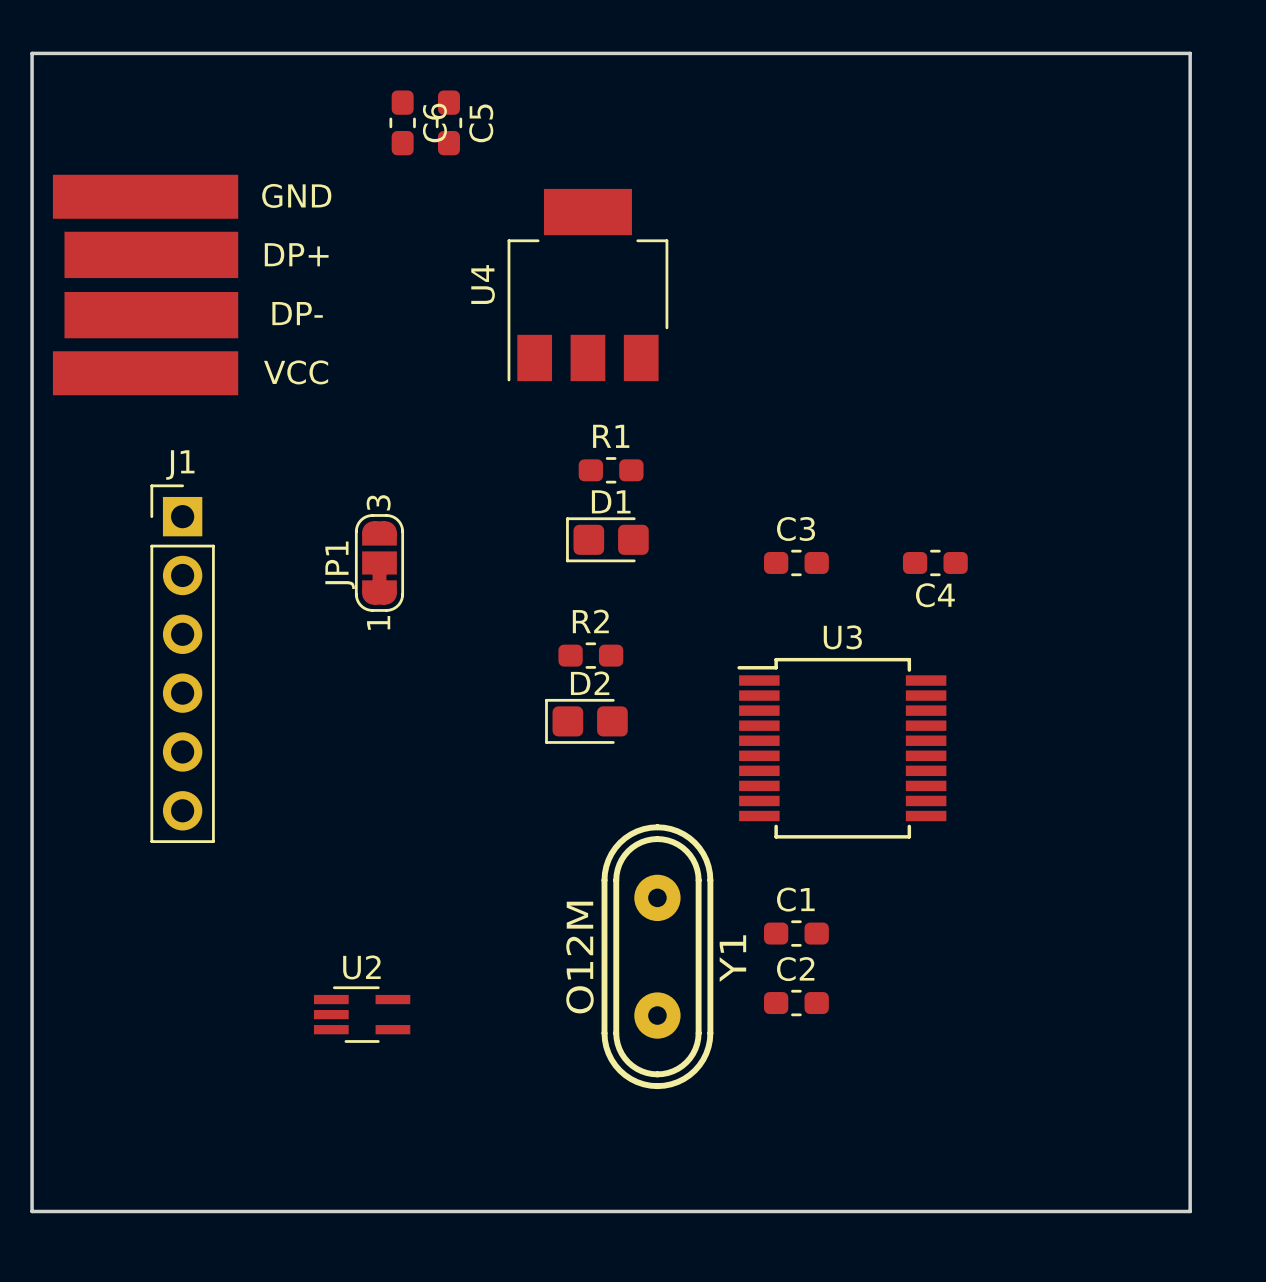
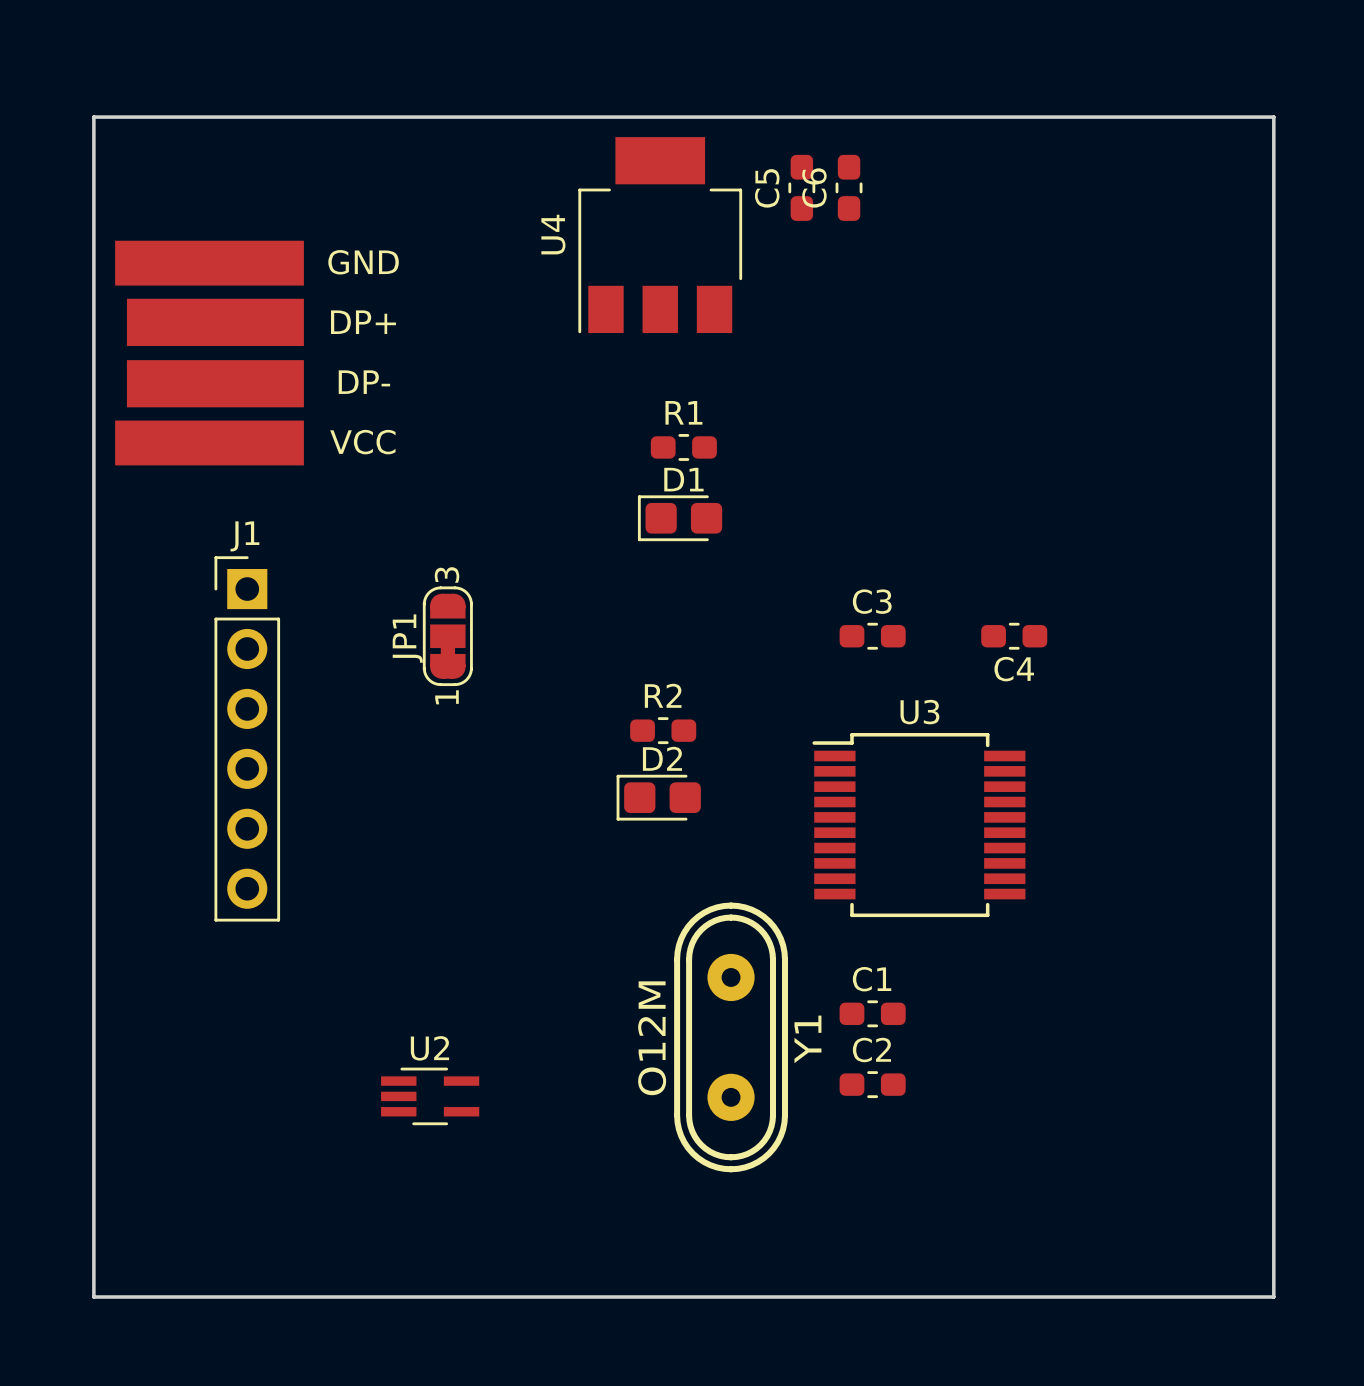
C6 position: (402, 122) -> (849, 187)
C5 position: (448, 122) -> (801, 187)
C6 name position: C6 (434, 123) -> C6 (814, 187)
C5 name position: C5 (481, 123) -> C5 (767, 188)
U4 position: (587, 285) -> (660, 235)
R1 position: (611, 470) -> (683, 447)
D1 position: (607, 539) -> (680, 518)

